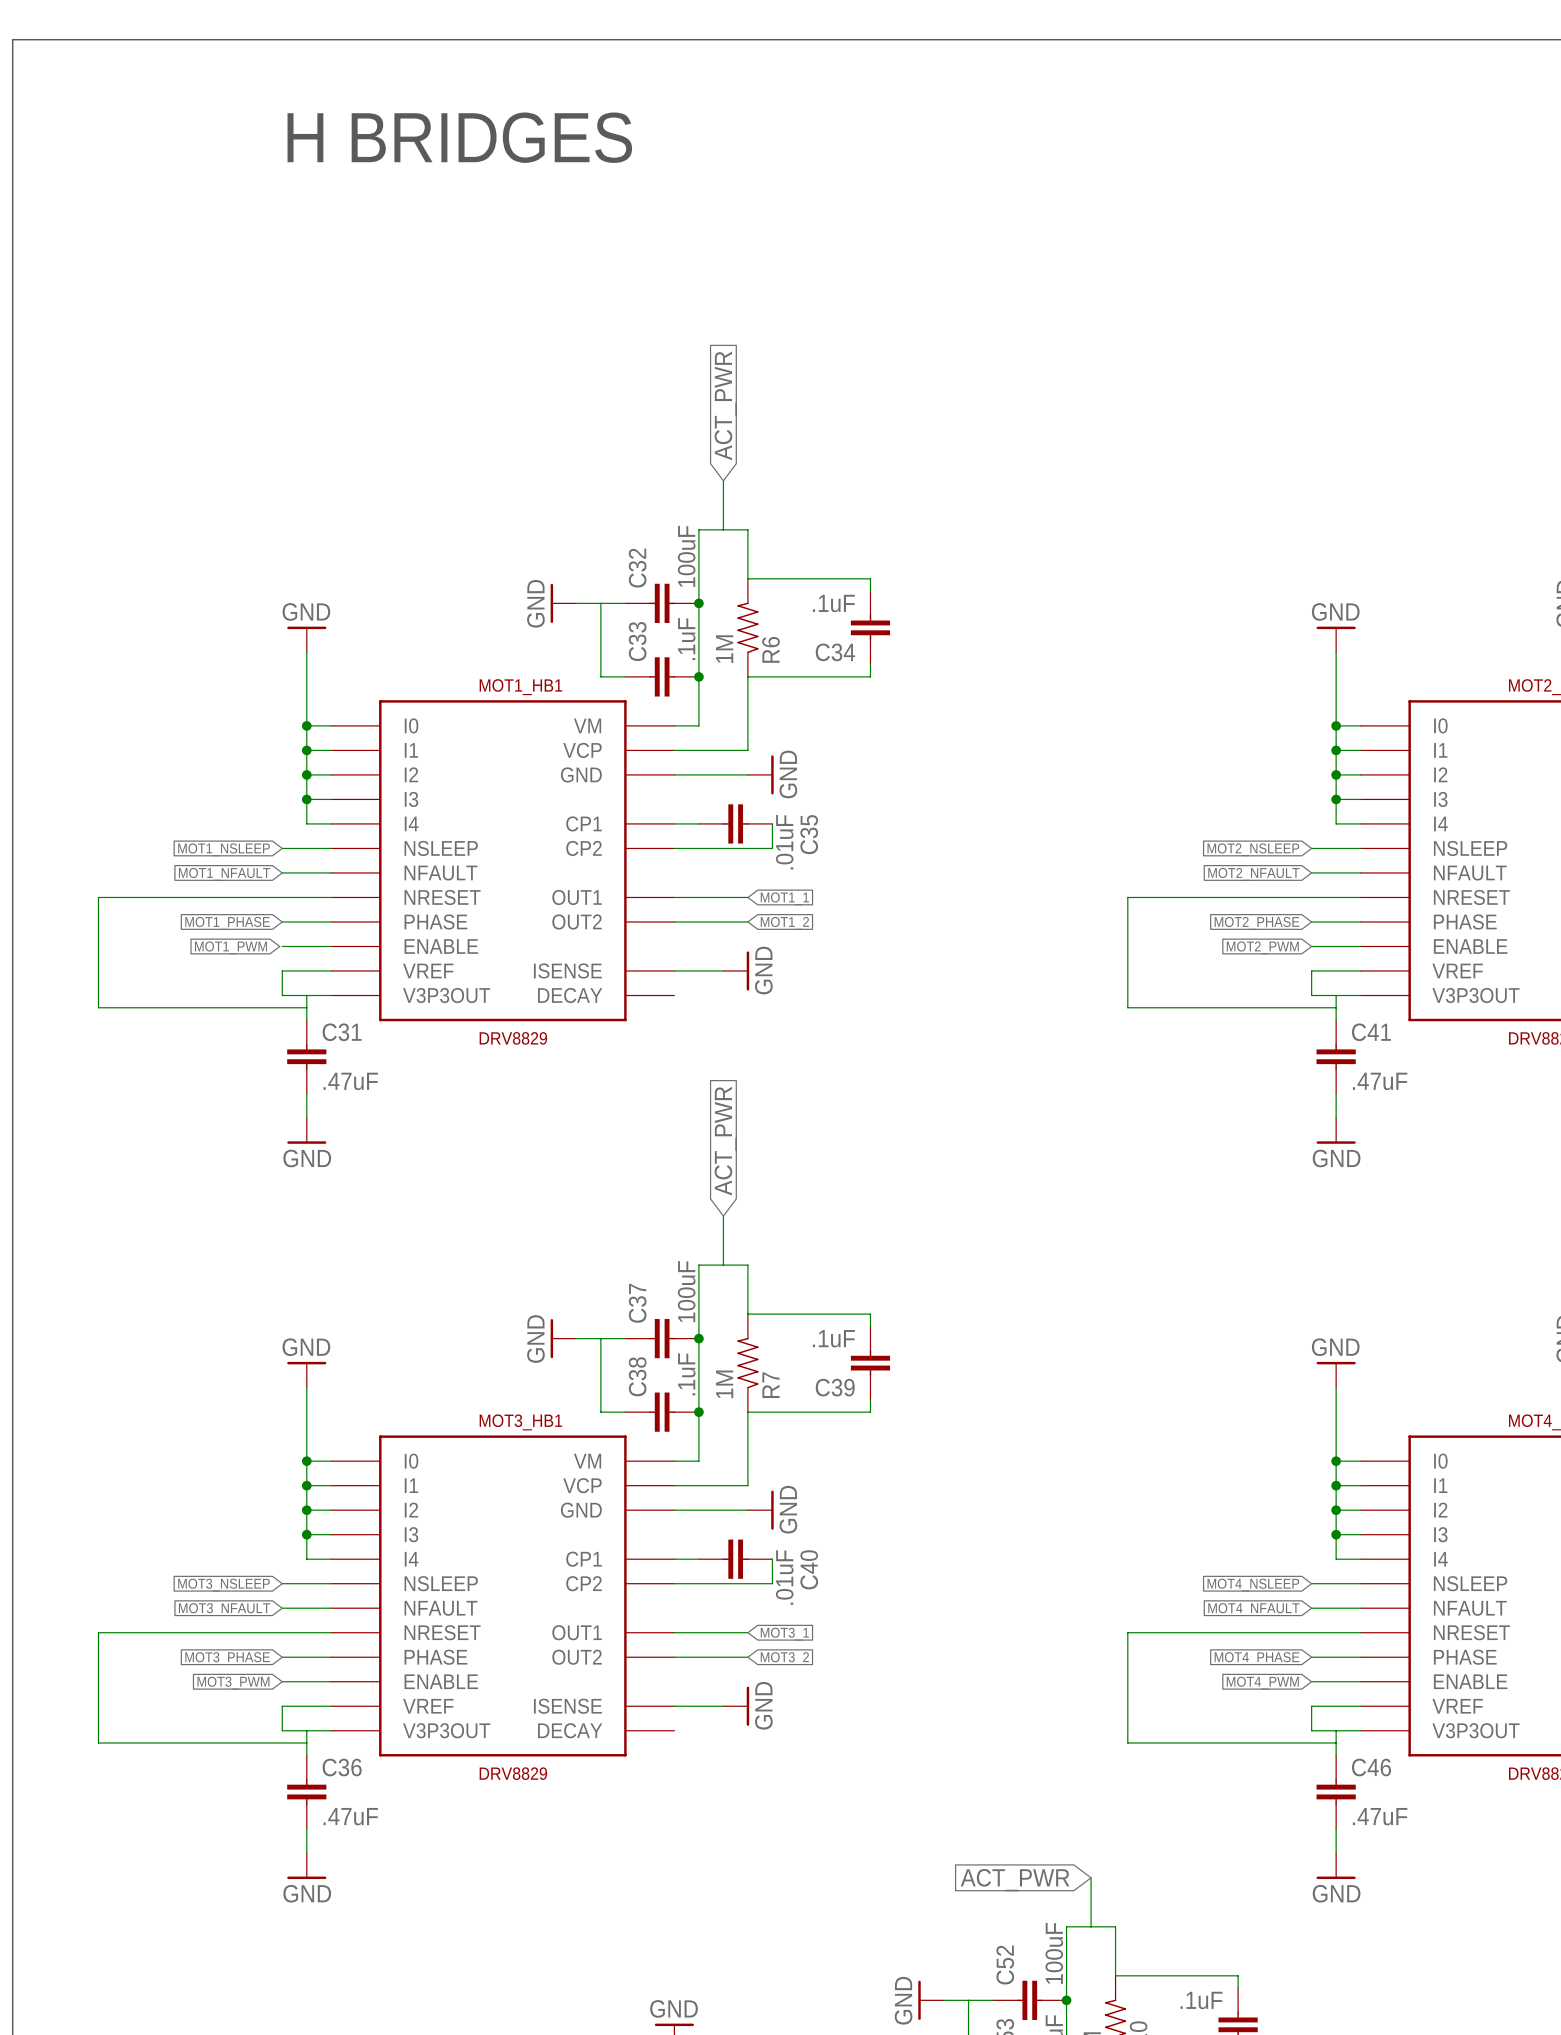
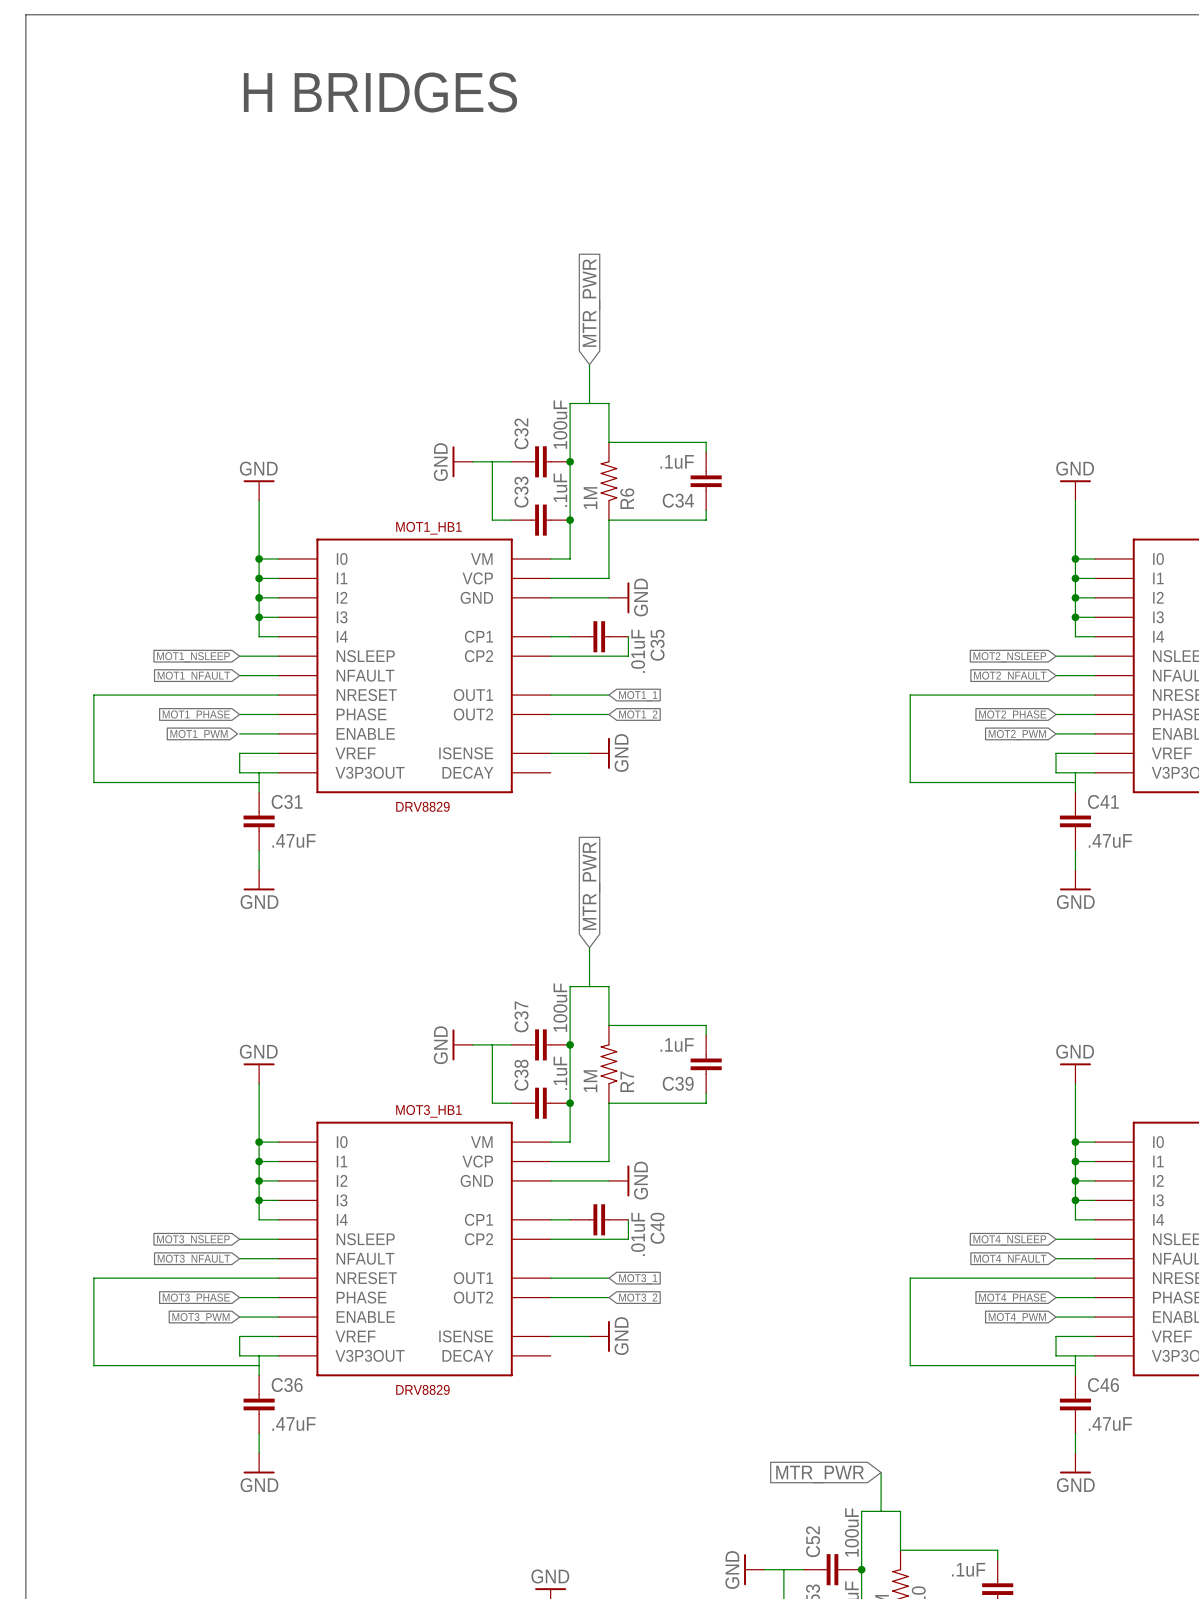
global label: ACT_PWR (725, 405) -> MTR_PWR (591, 302)
global label: ACT_PWR (725, 1141) -> MTR_PWR (591, 886)
global label: ACT_PWR (1015, 1880) -> MTR_PWR (820, 1474)

